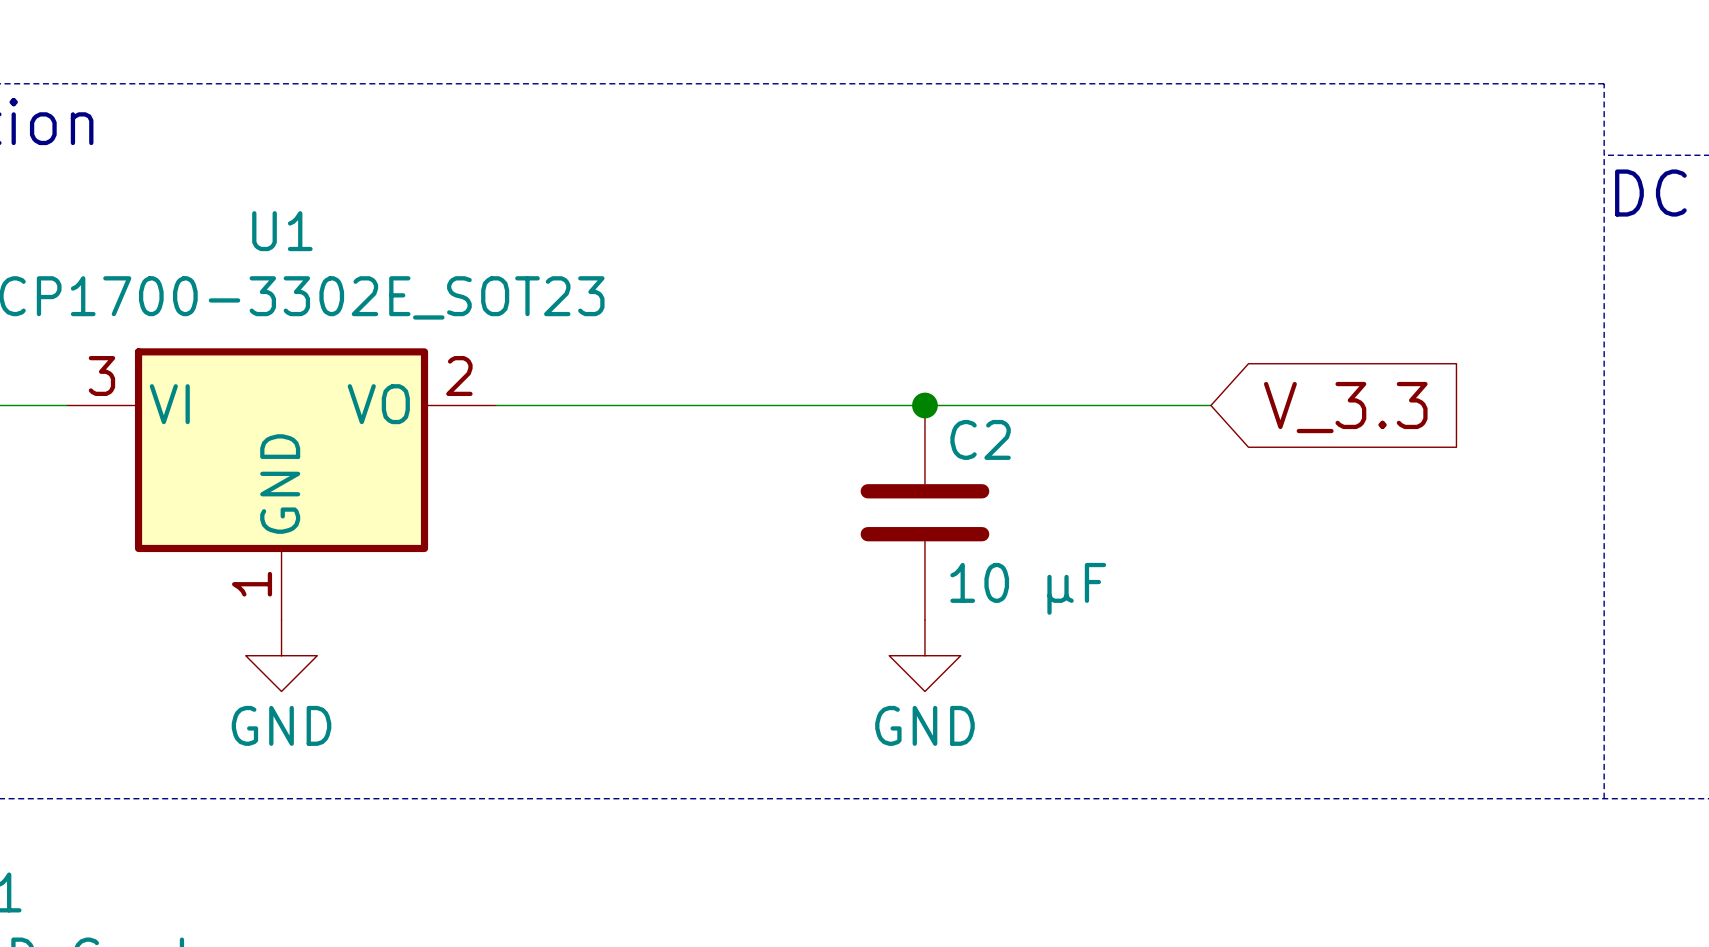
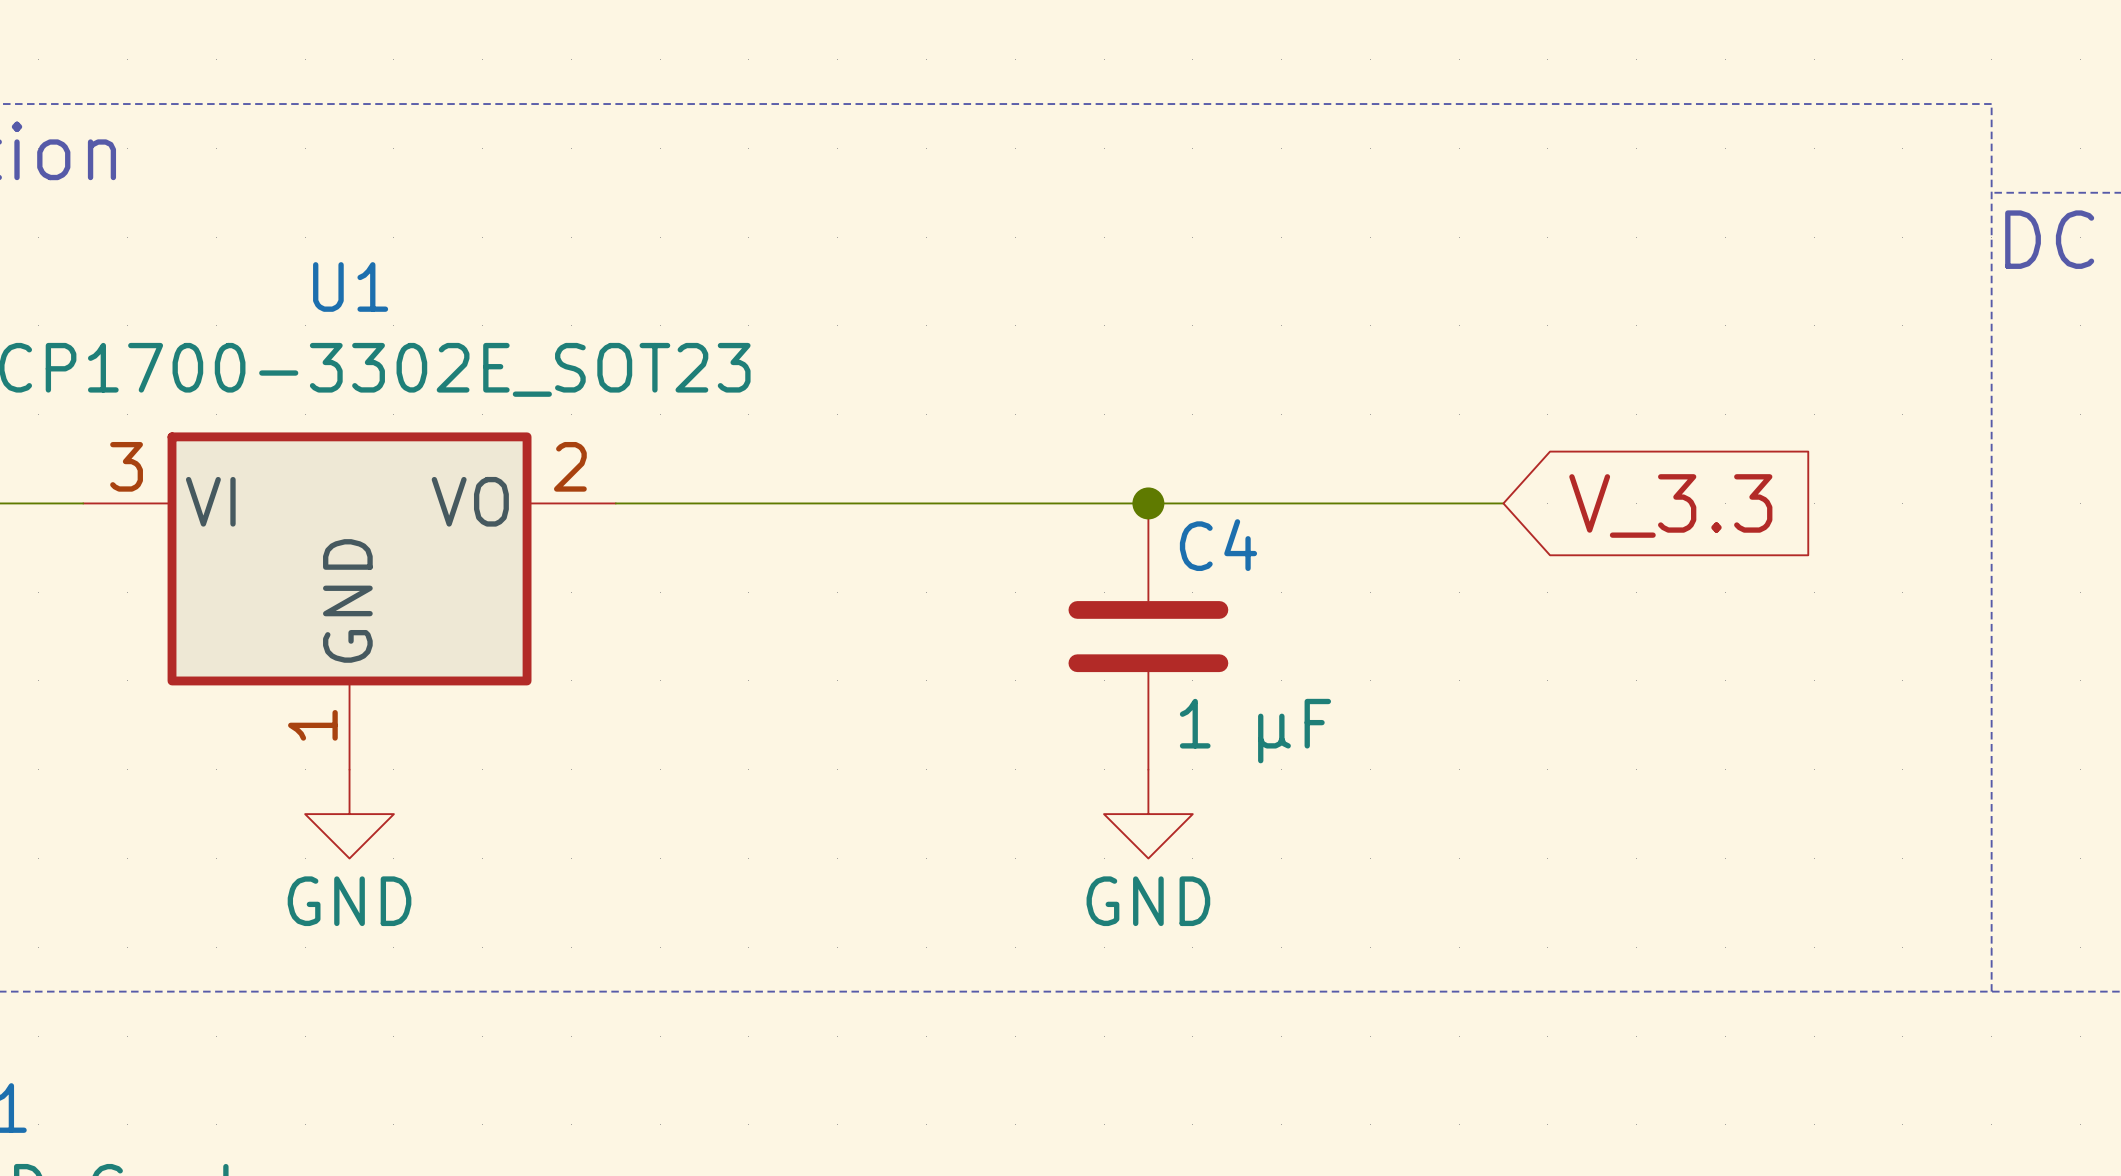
C2 name: C2 (980, 439) -> C4 (1218, 545)
C2 value: 10 μF (1028, 588) -> 1 μF (1255, 731)

